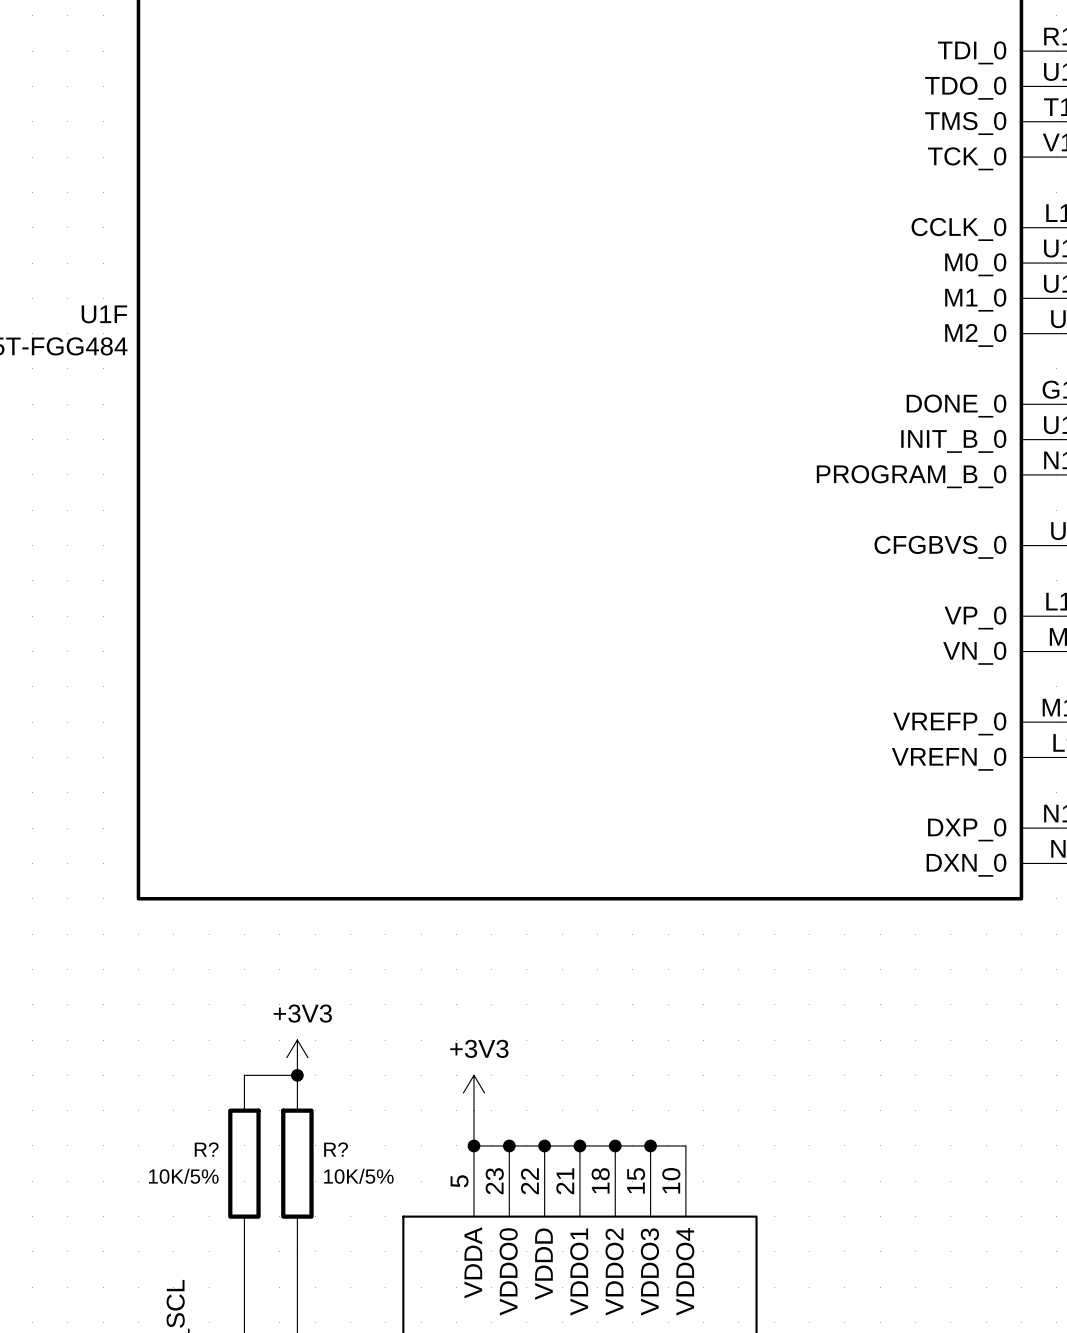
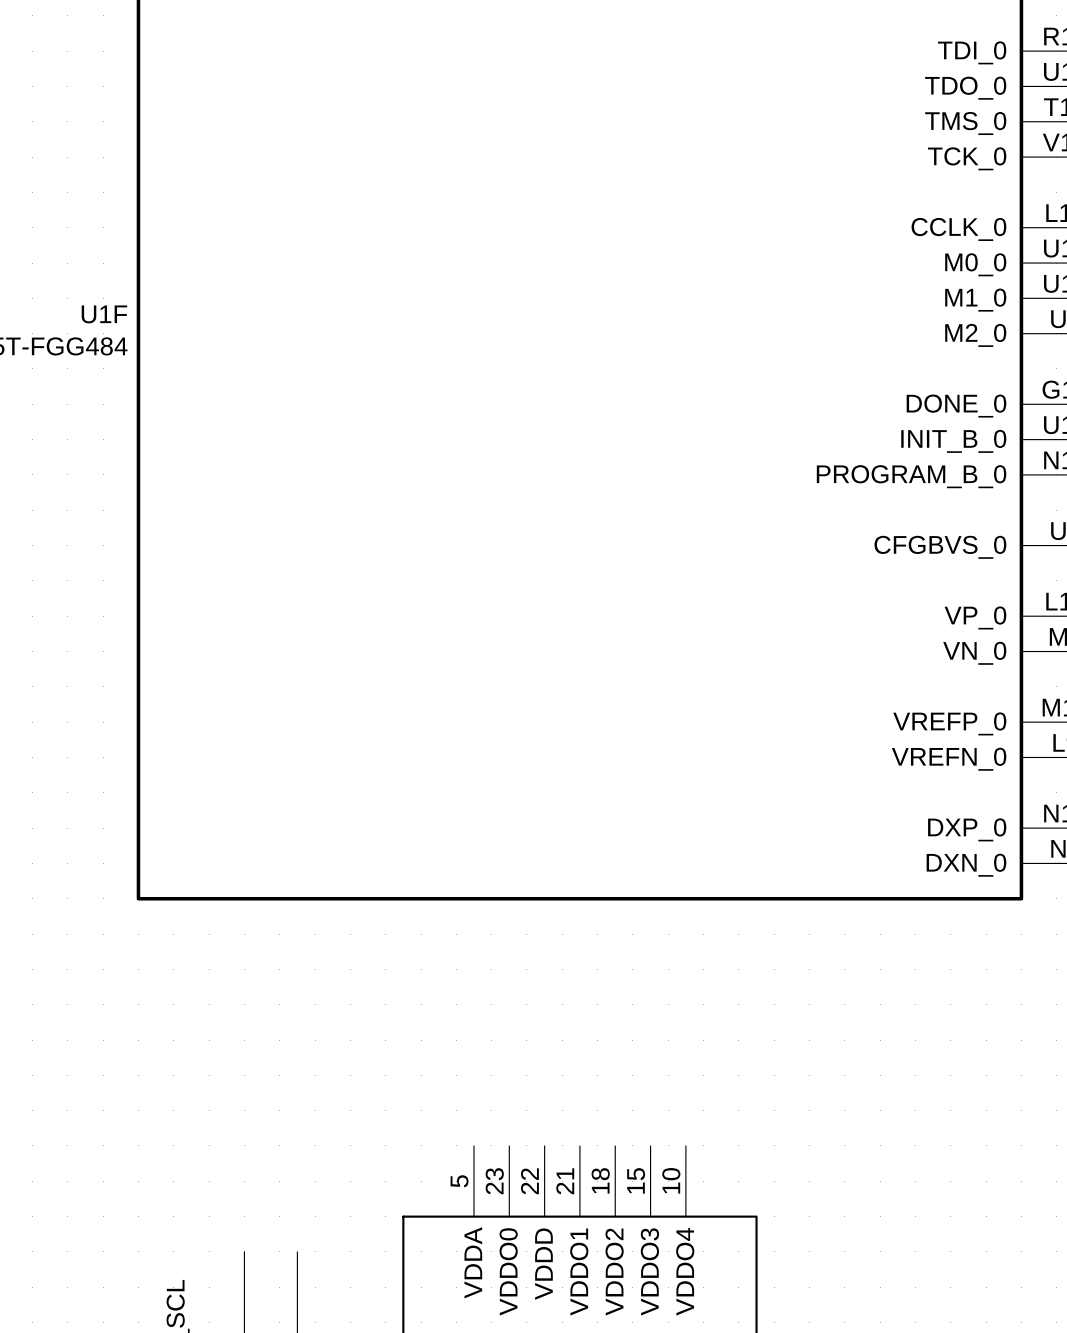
power symbol: +3V3 (297, 1057) -> none
wire: (244, 1075) (297, 1075) -> none
junction: (297, 1075) -> none
power symbol: +3V3 (473, 1093) -> none
wire: (473, 1110) (473, 1145) (685, 1145) -> none
junction: (473, 1145) -> none
junction: (509, 1145) -> none
junction: (544, 1145) -> none
junction: (579, 1145) -> none
junction: (615, 1145) -> none
junction: (650, 1145) -> none
R?: 10K/5% (244, 1163) -> none
R?: 10K/5% (297, 1163) -> none

